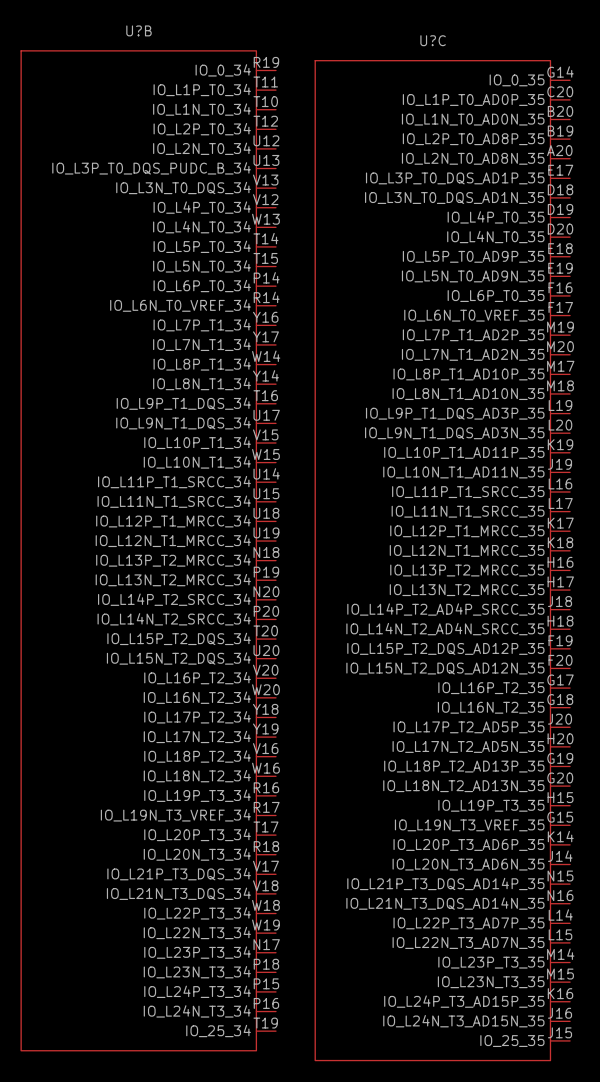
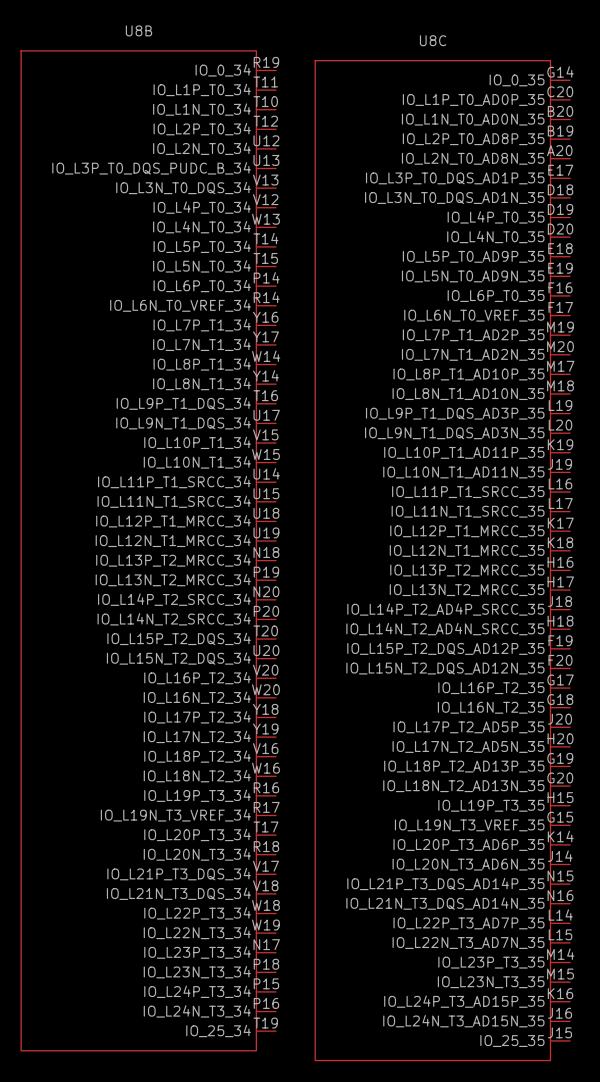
U?B name: U?B (138, 30) -> U8B (138, 30)
U?C name: U?C (433, 40) -> U8C (433, 40)

